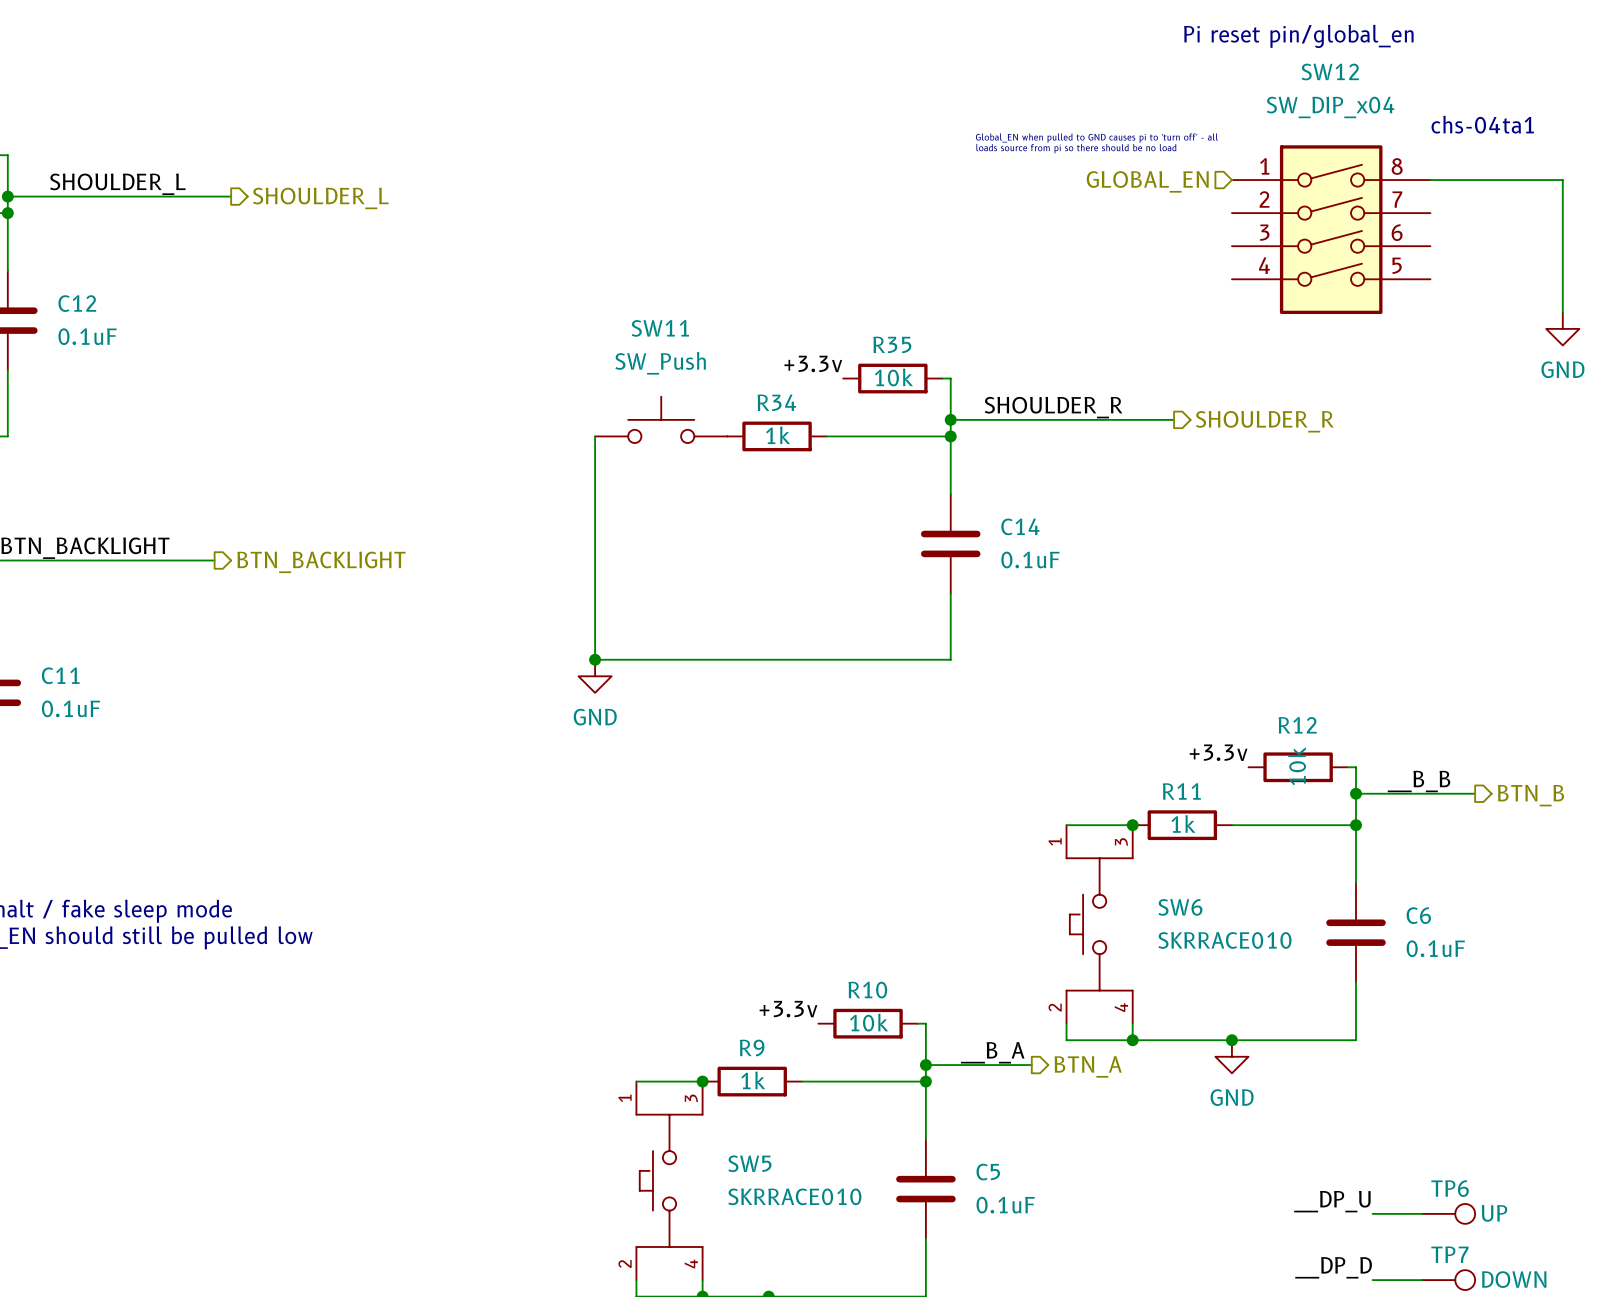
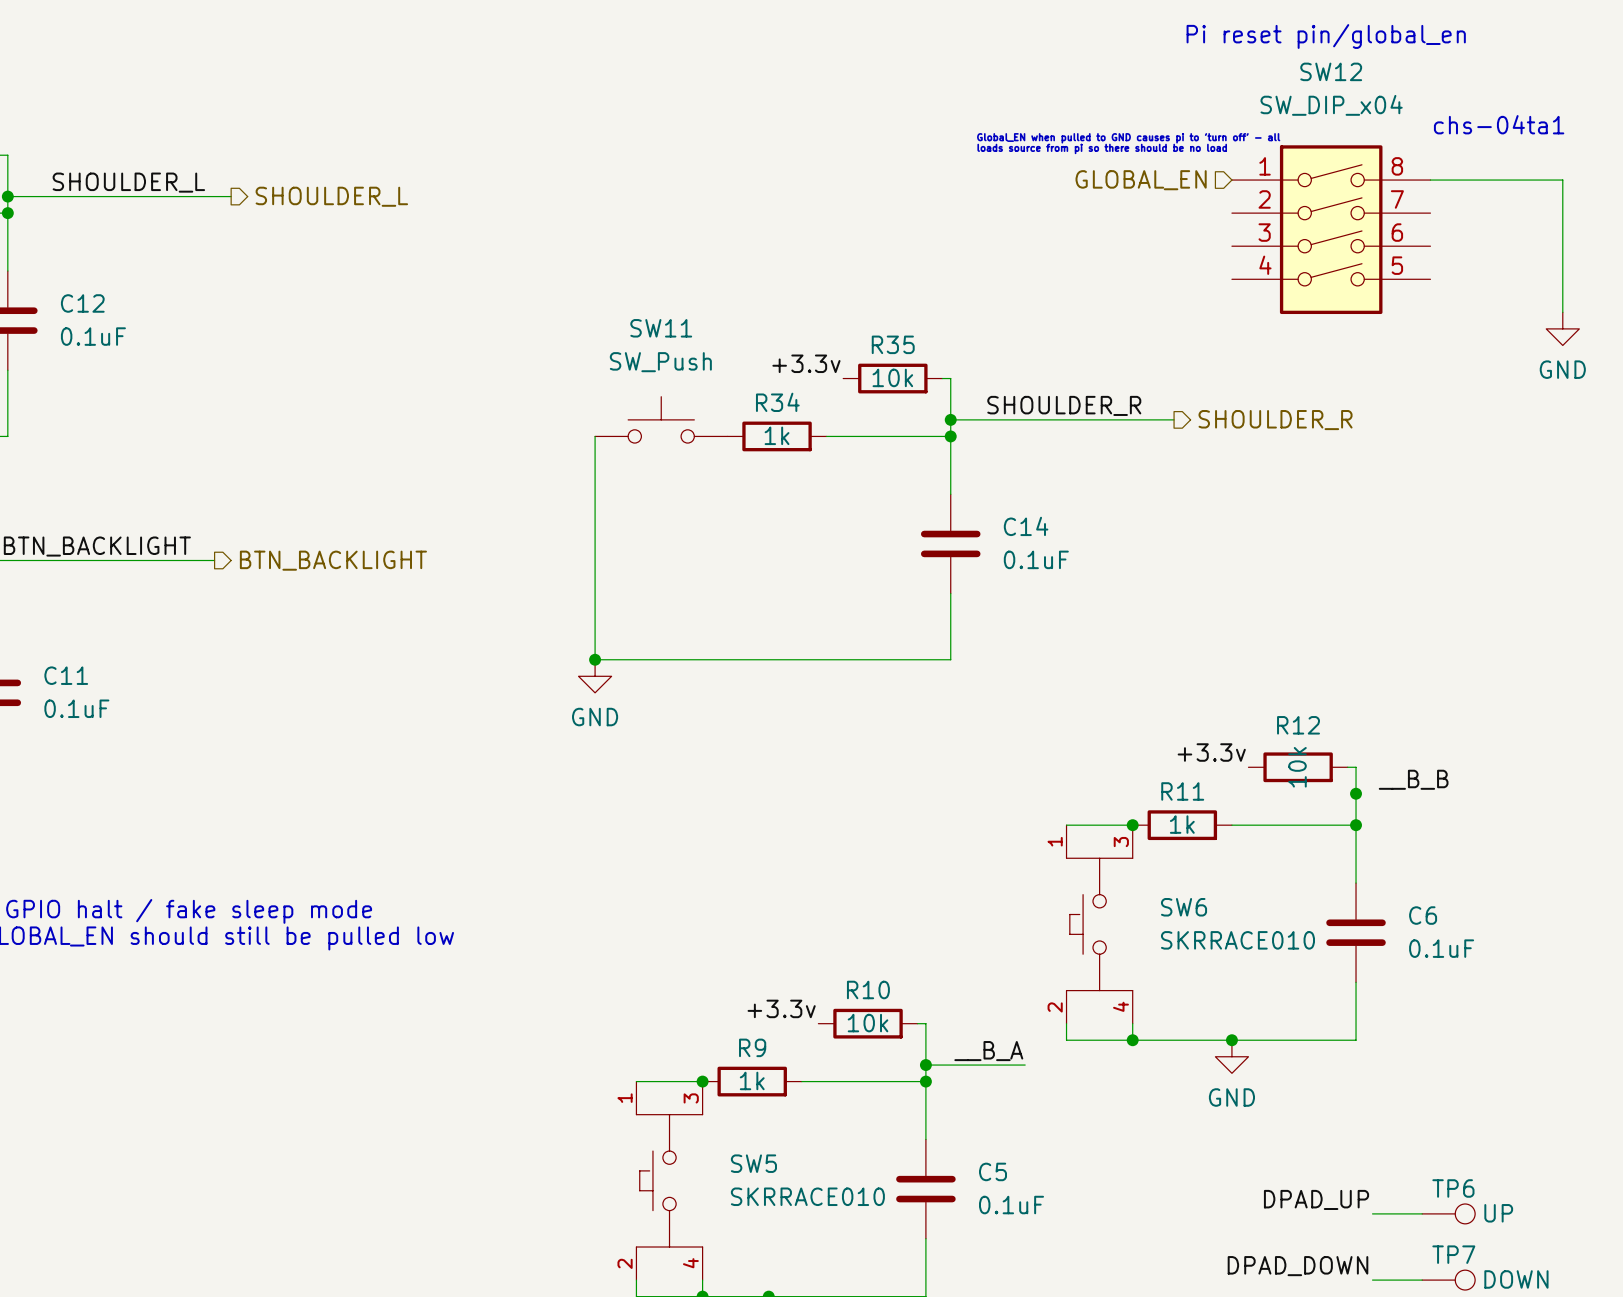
wire: (1356, 793) (1475, 793) -> none
hierarchical label: BTN_B (1530, 795) -> none
wire: (1025, 1065) (1031, 1065) -> none
hierarchical label: BTN_A (1088, 1066) -> none
label: __DP_U (1332, 1201) -> DPAD_UP (1316, 1199)
label: __DP_D (1333, 1267) -> DPAD_DOWN (1297, 1266)

